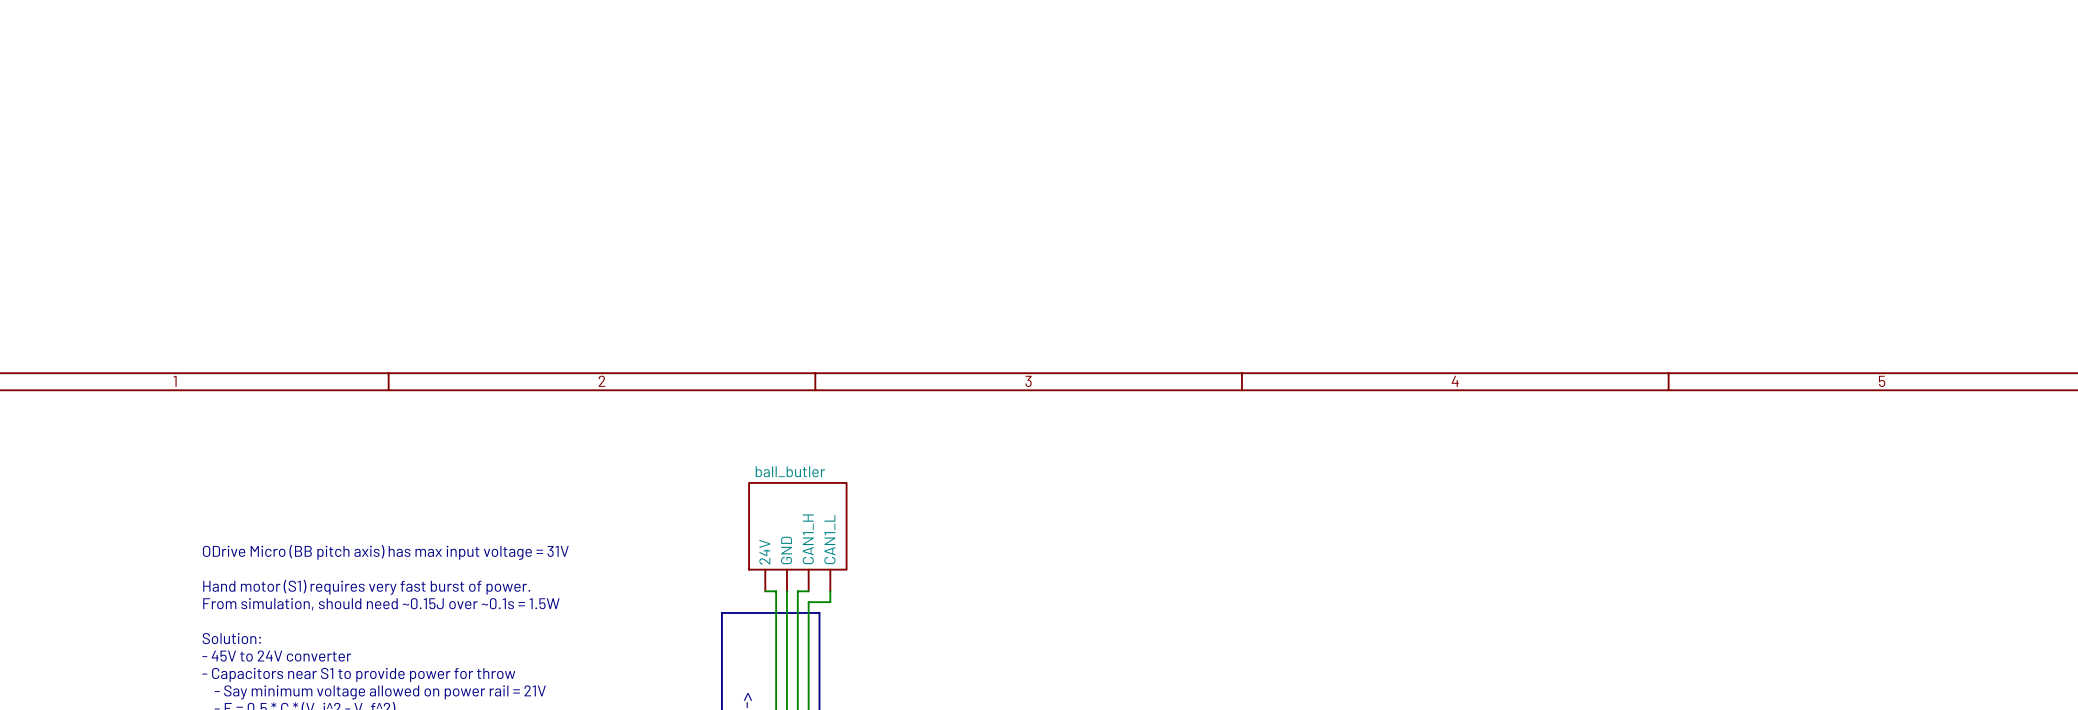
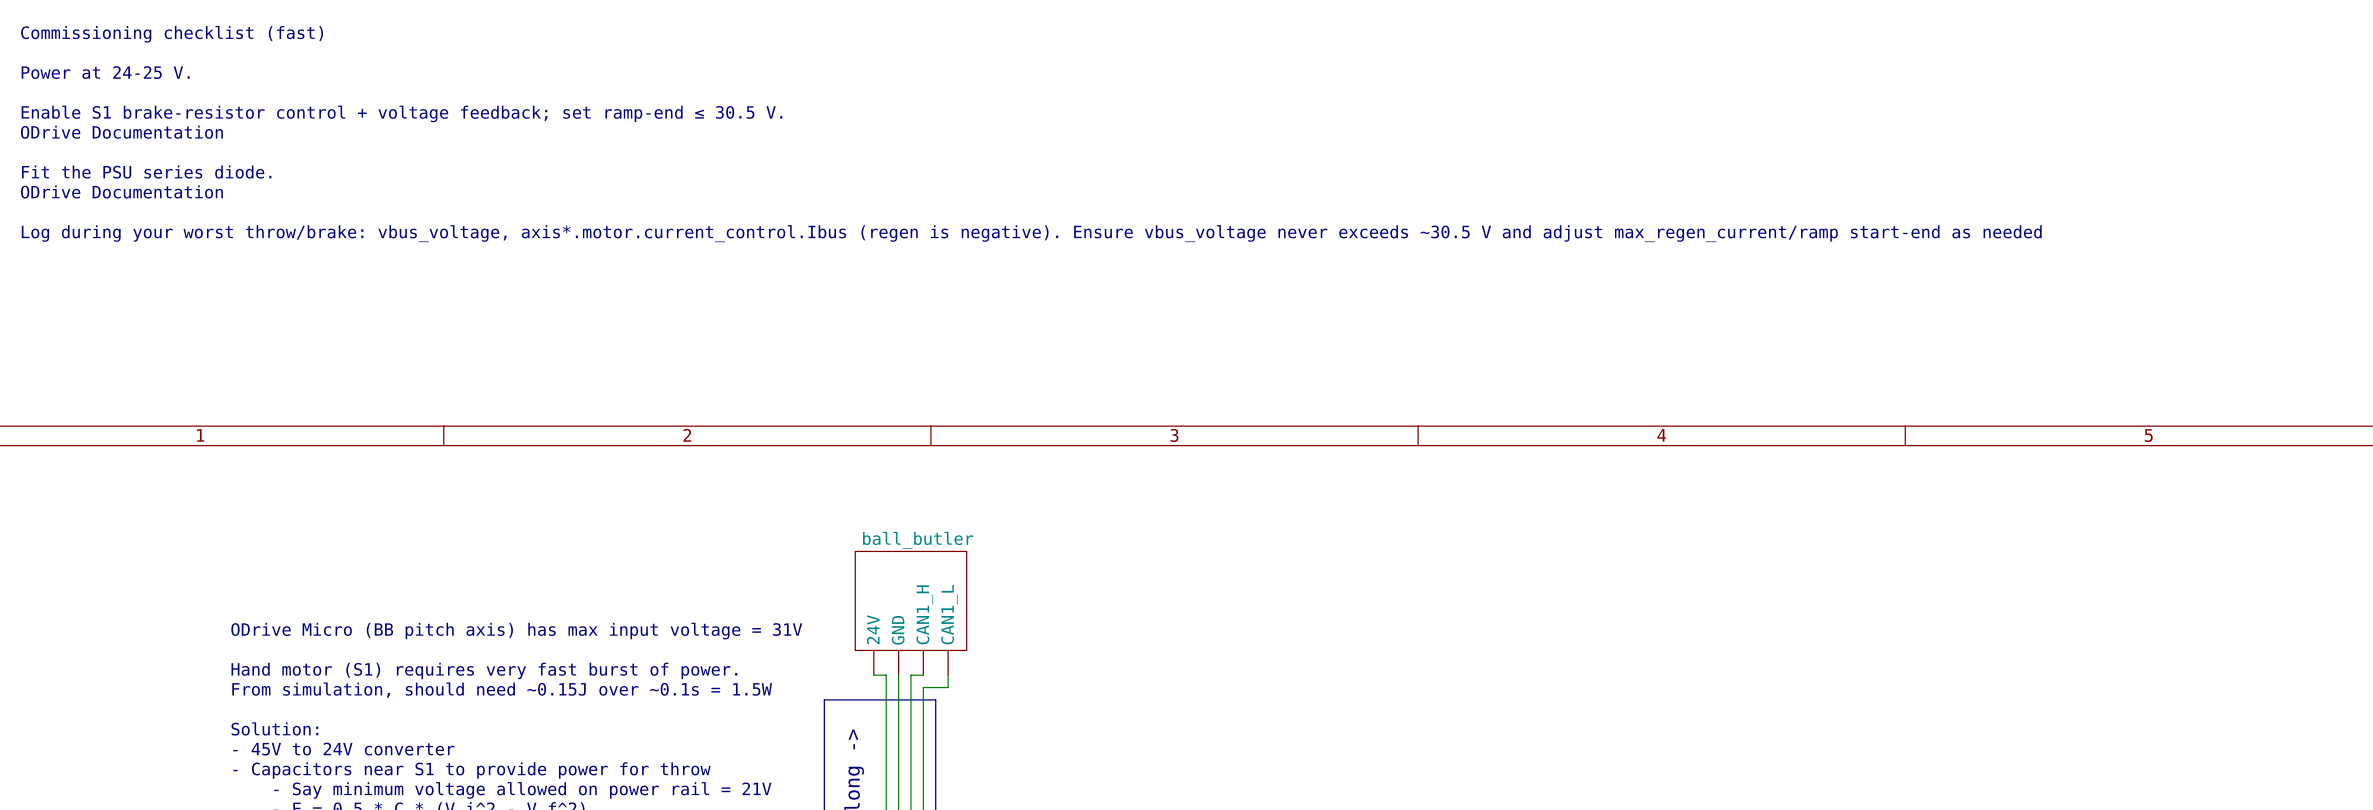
text: none -> Commissioning checklist (fast) (172, 34)
text: none -> Power at 24-25 V. (105, 72)
text: none -> Enable S1 brake-resistor control + voltage feedback; set ramp-end ≤ 30.5 V. (401, 113)
text: none -> ODrive Documentation (121, 132)
text: none -> Fit the PSU series diode. (146, 172)
text: none -> ODrive Documentation (121, 191)
text: none -> Log during your worst throw/brake: vbus_voltage, axis*.motor.current_control.Ibus (regen is negative). Ensure vbus_voltage never exceeds ~30.5 V and adjust max_regen_current/ramp start-end as needed (1031, 233)

